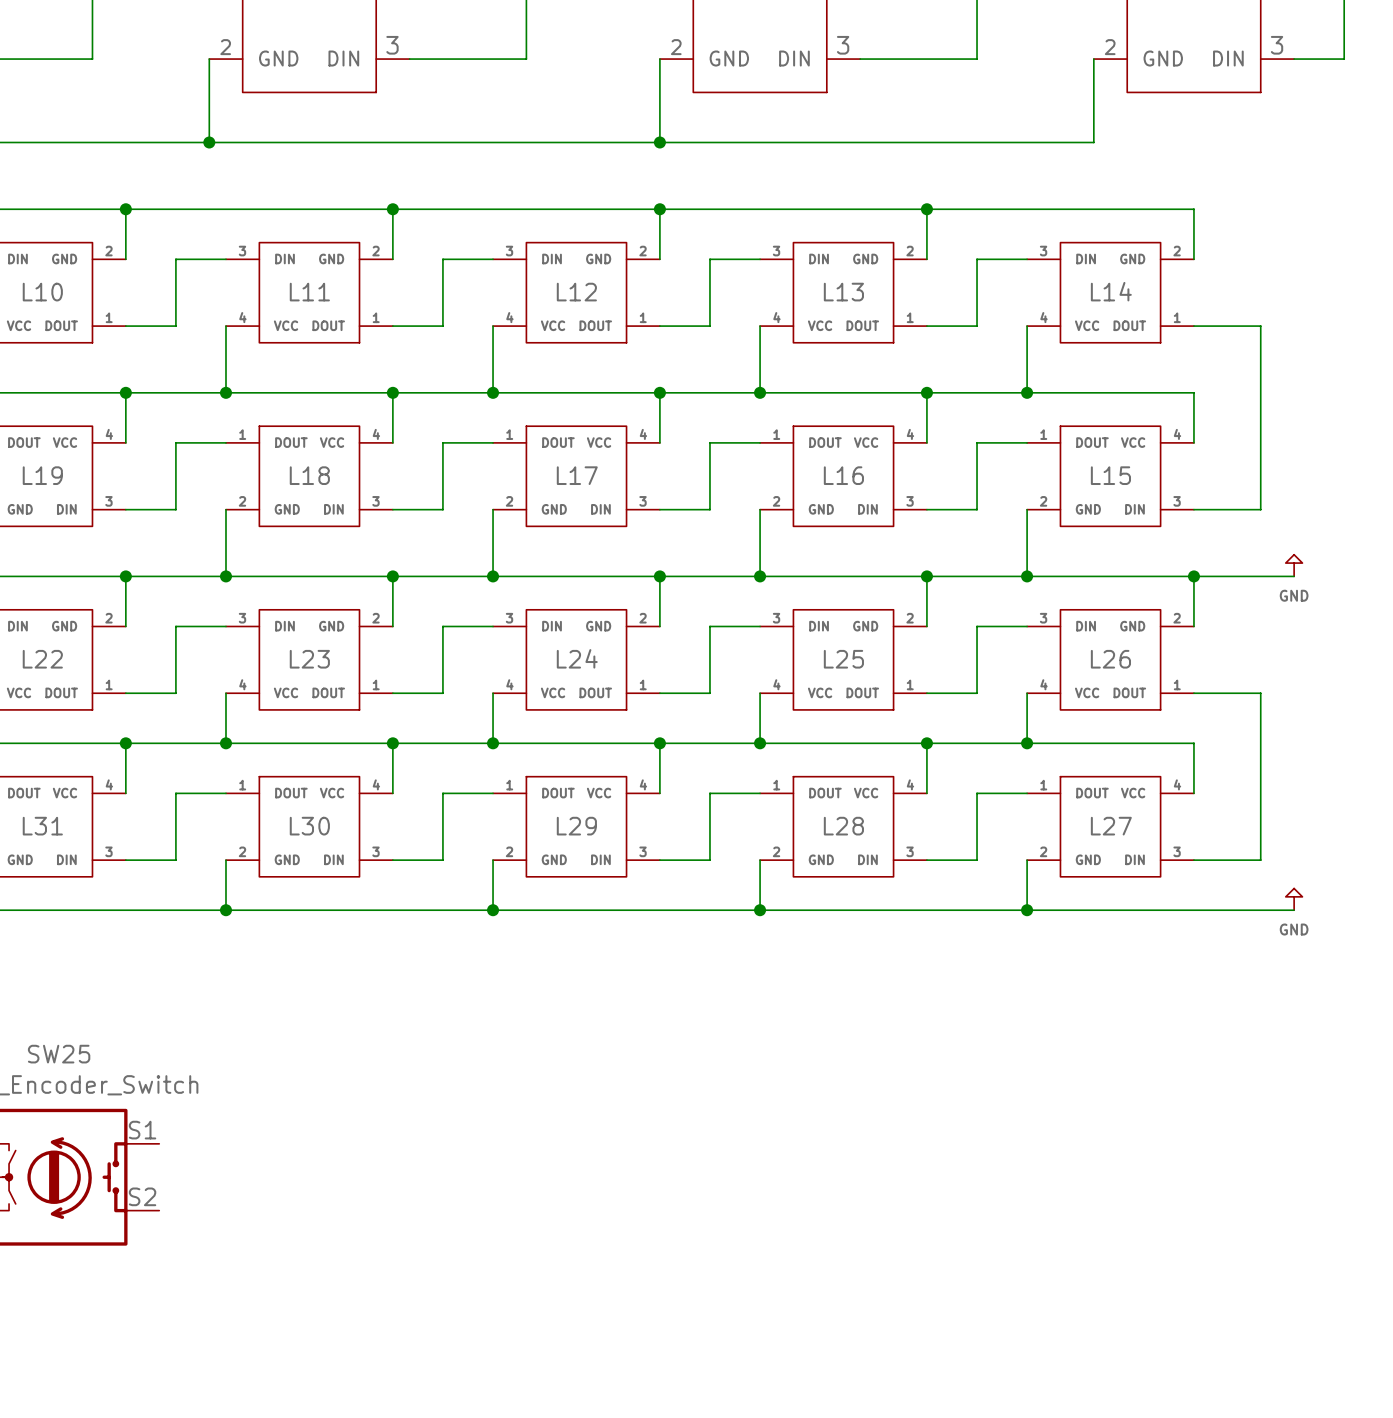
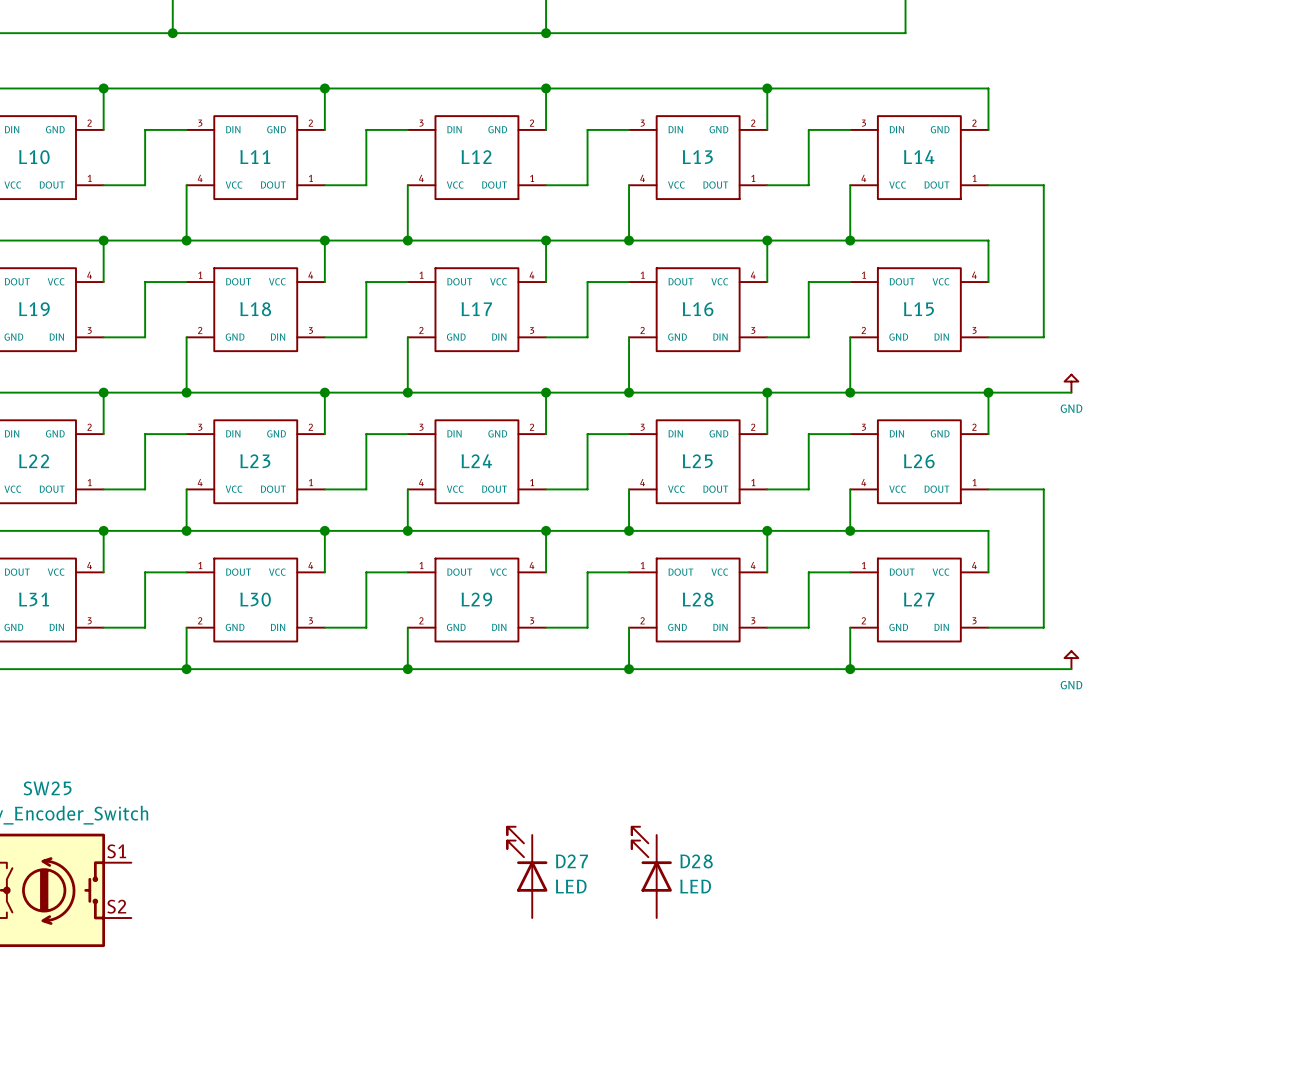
D27: none -> LED (527, 872)
D28: none -> LED (651, 872)

